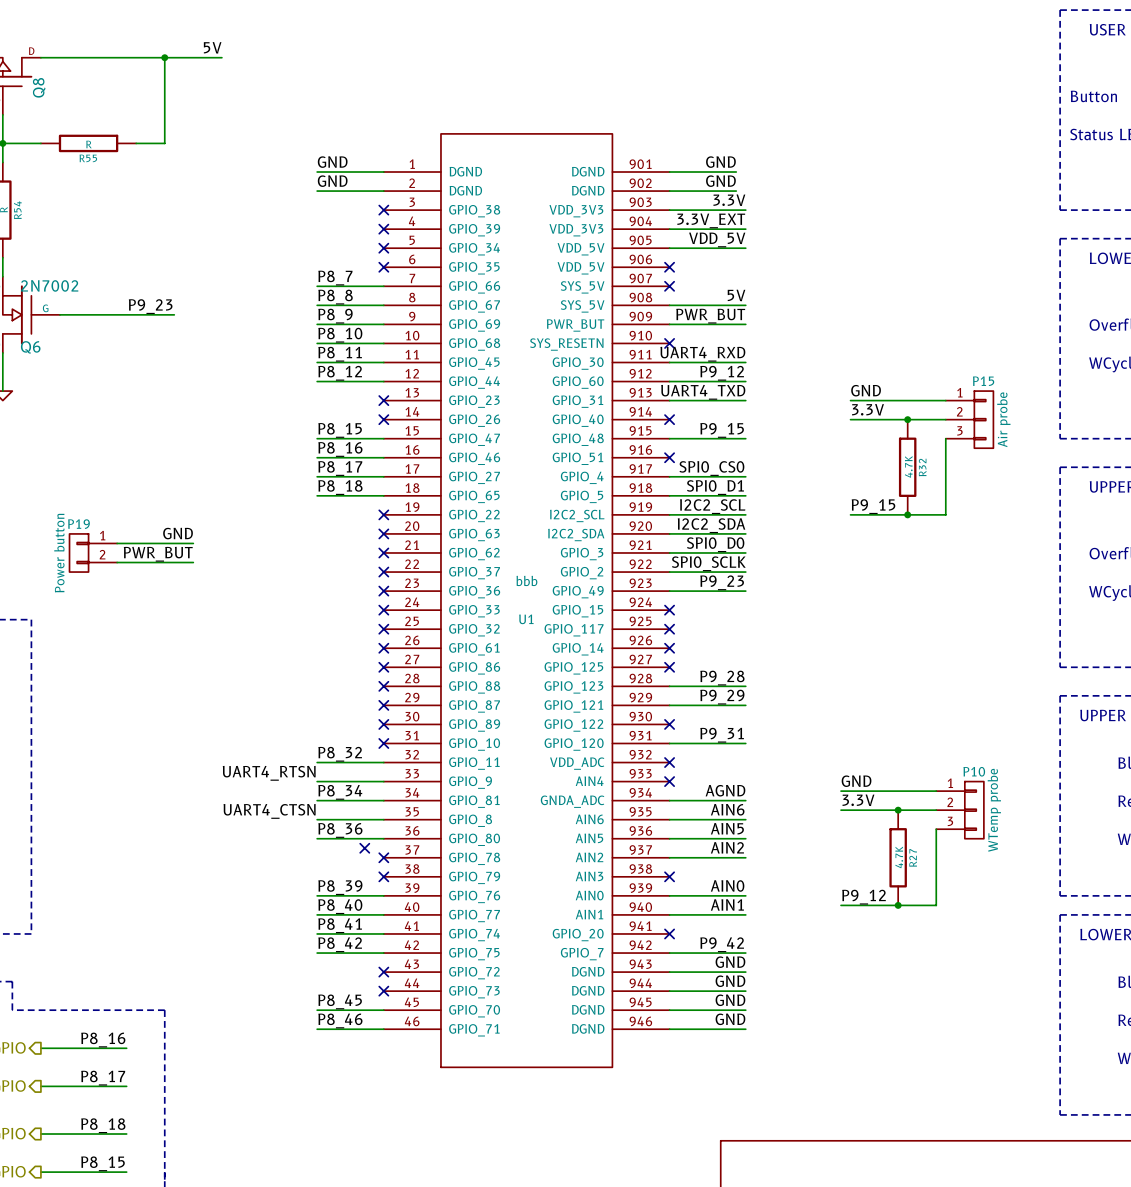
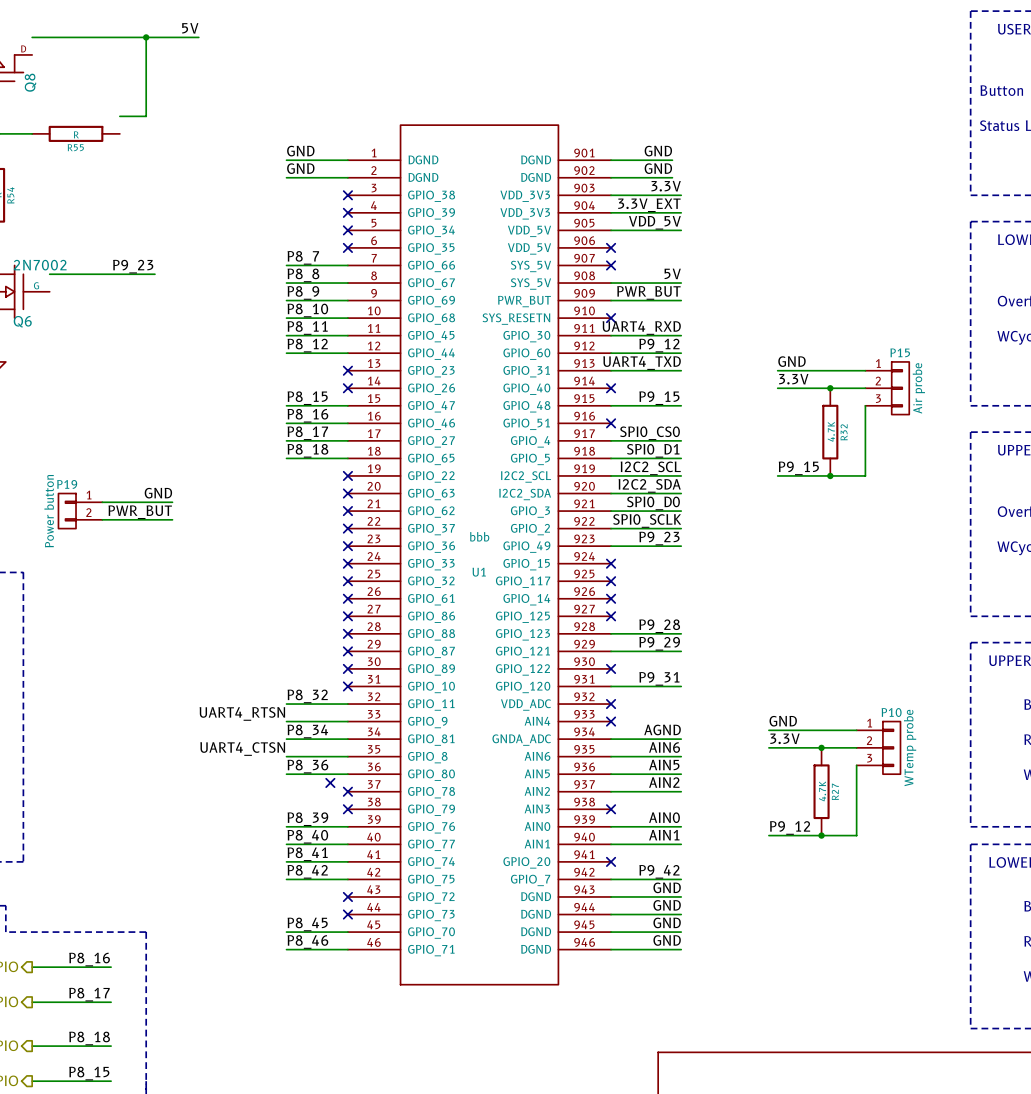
wire: none -> (146, 37) (146, 54)
label position: 5V (212, 47) -> 5V (190, 28)
wire: (40, 57) (221, 57) -> (32, 37) (198, 37)
junction position: (164, 57) -> (146, 37)
wire: (164, 124) (164, 143) (136, 143) -> (146, 116) (119, 116)
label position: P9_23 (150, 306) -> P9_23 (133, 266)
wire: (59, 314) (174, 314) -> (49, 274) (154, 274)

